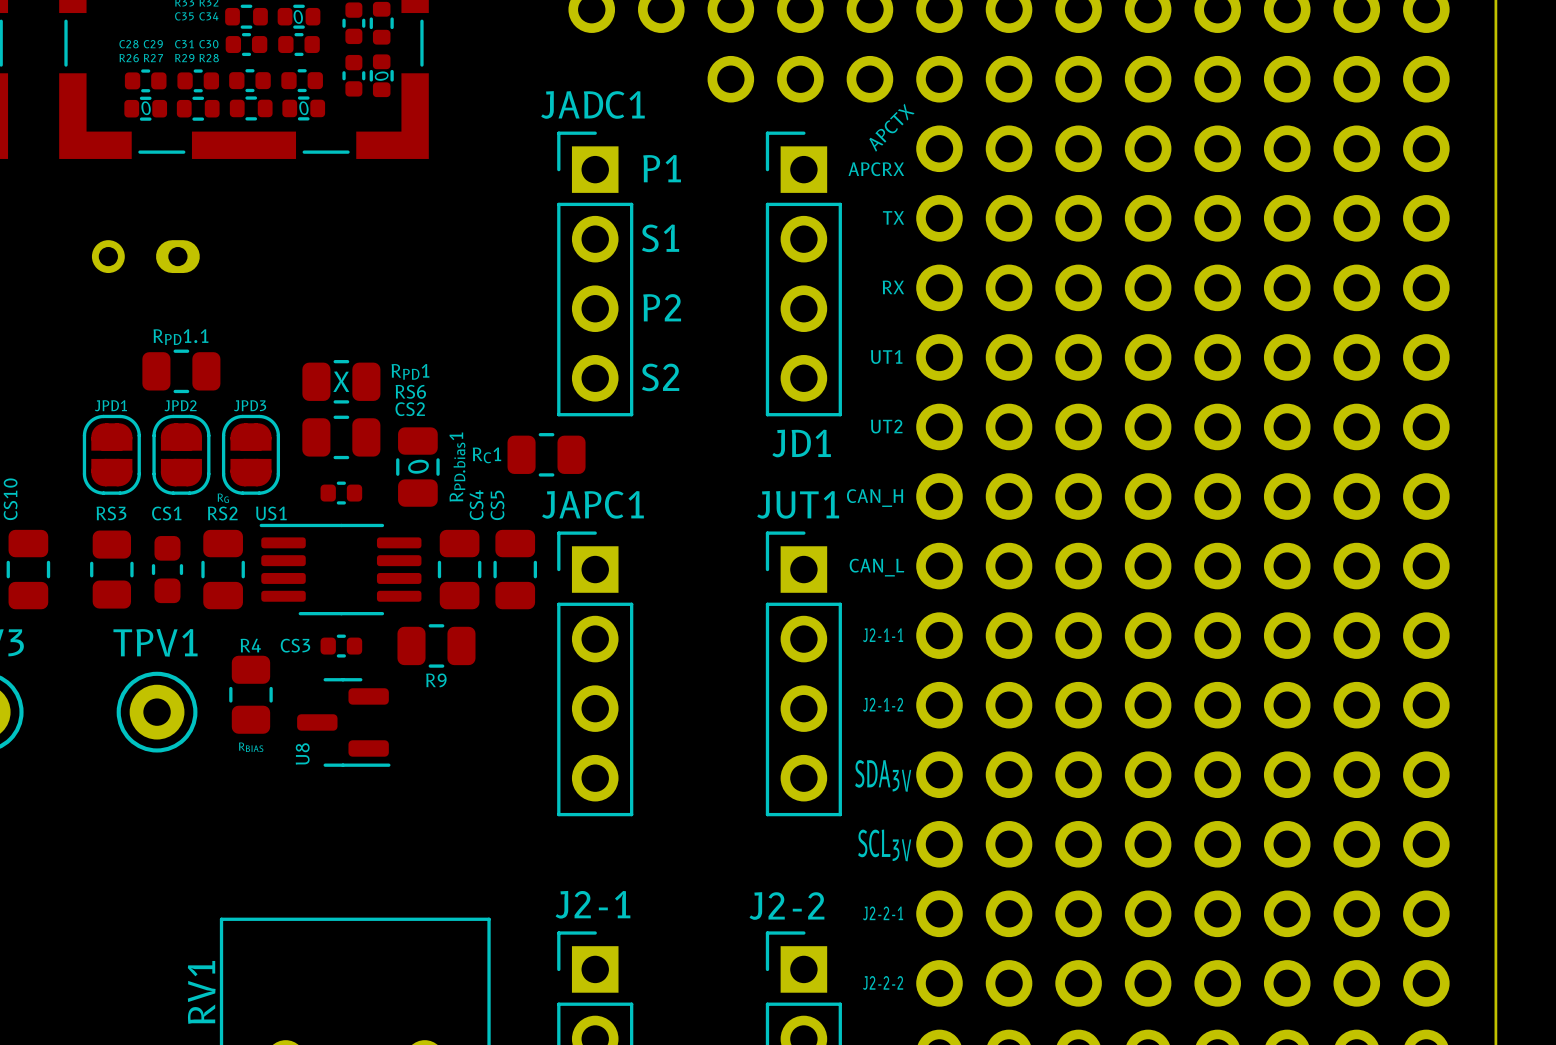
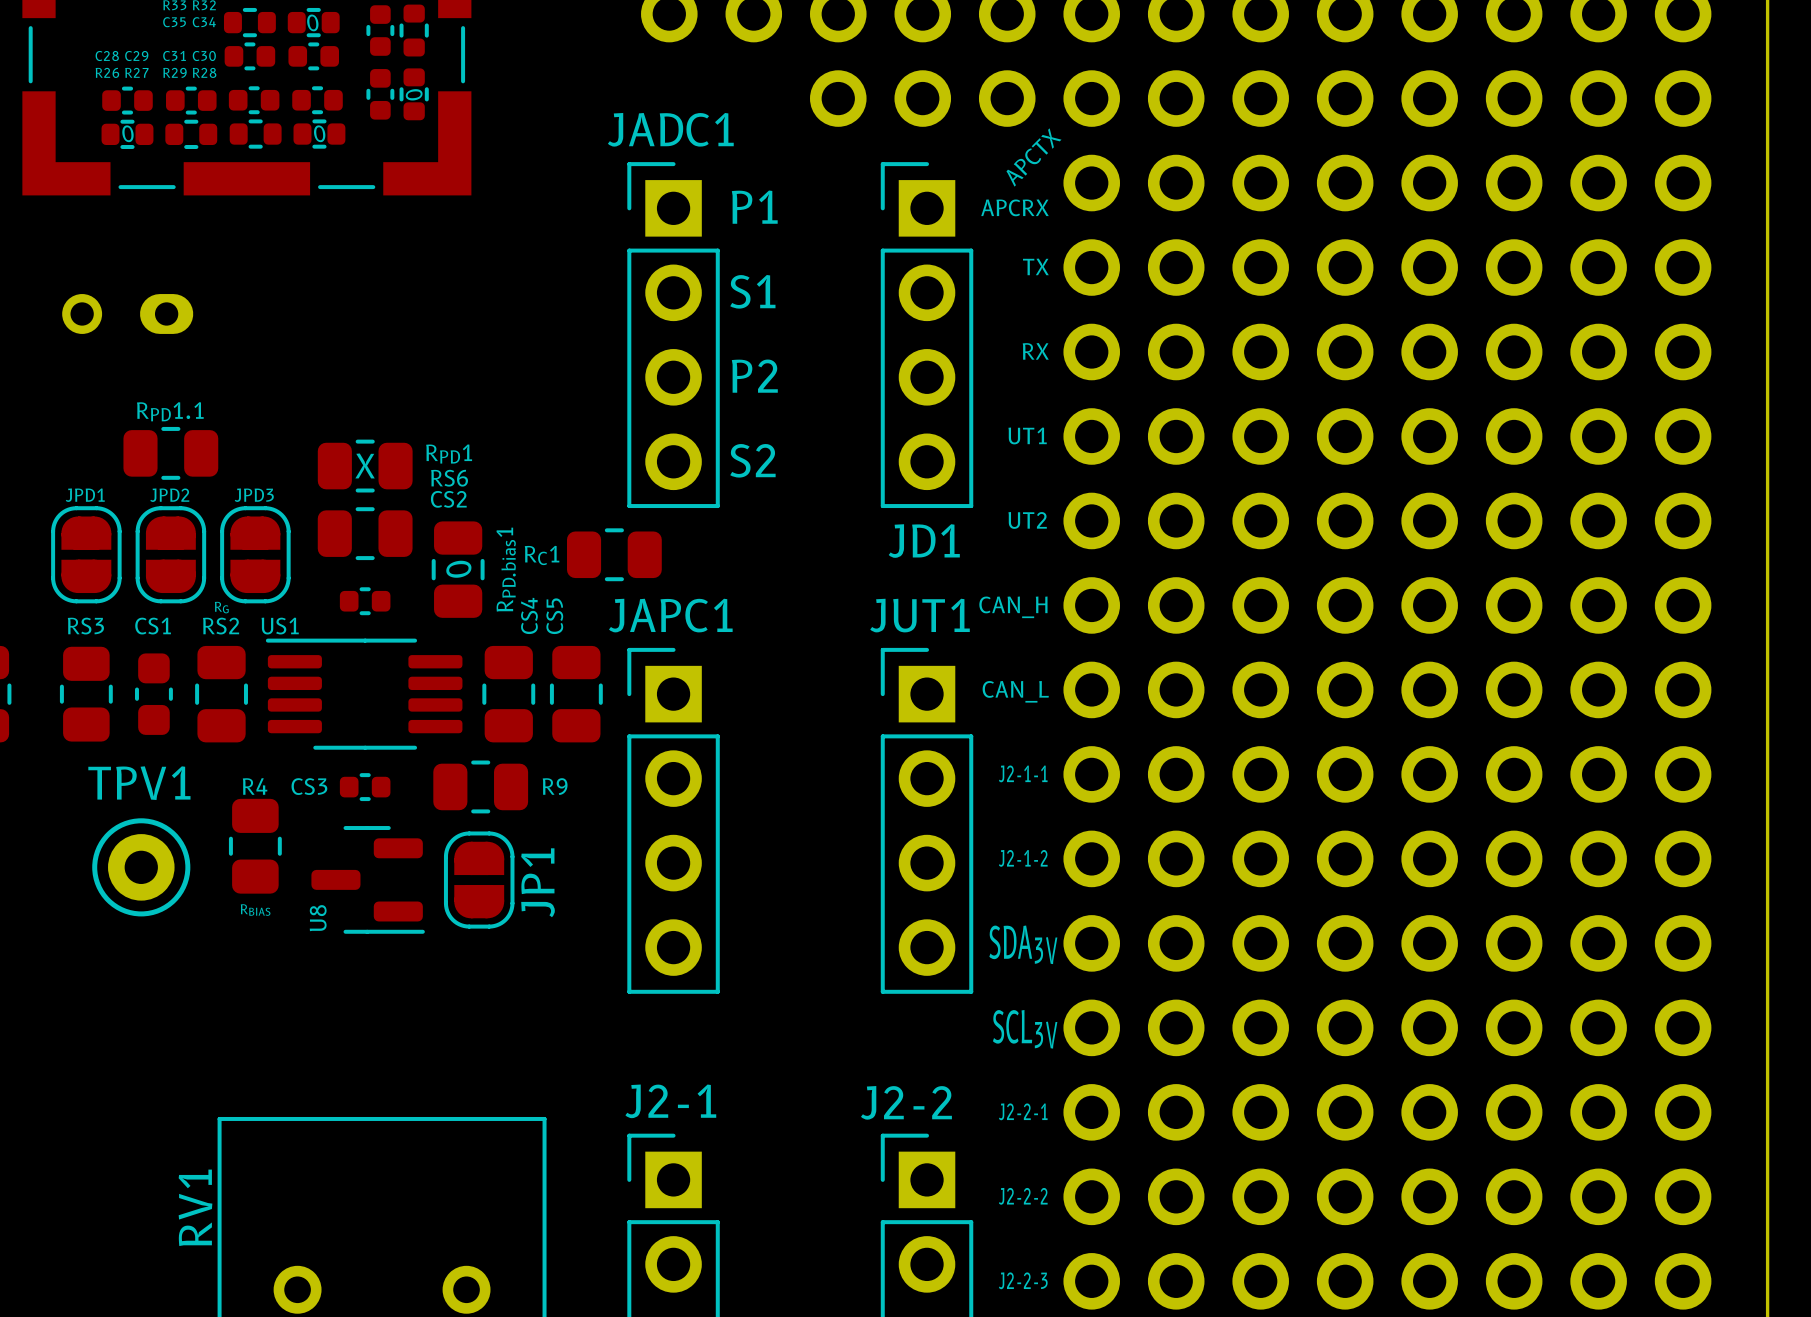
R9 name position: R9 (436, 680) -> R9 (555, 786)
JP1: none -> (479, 880)

